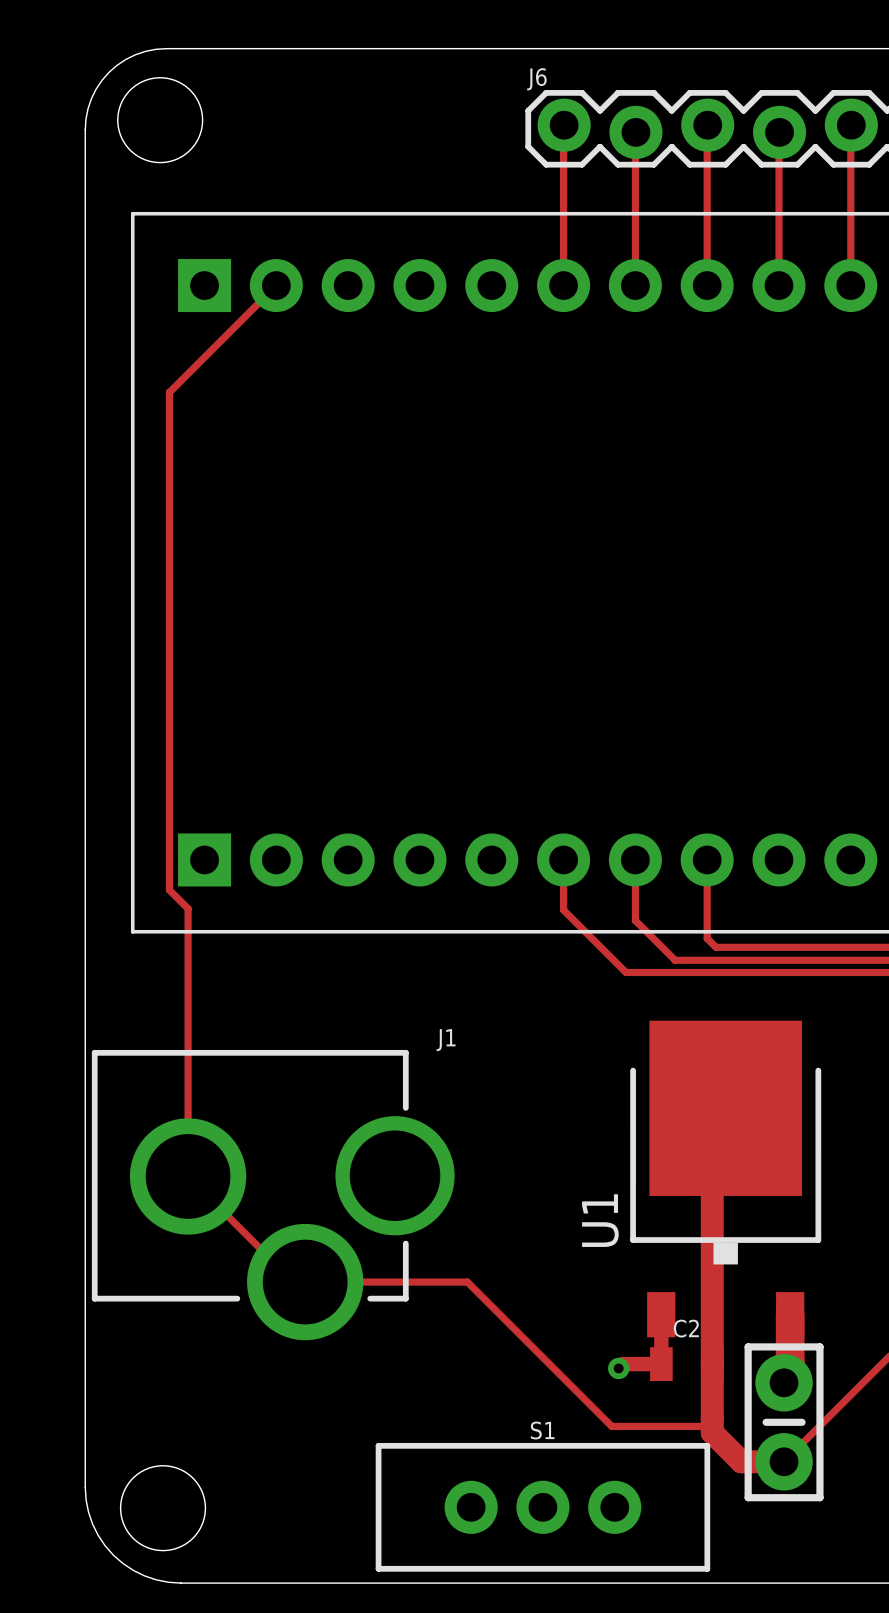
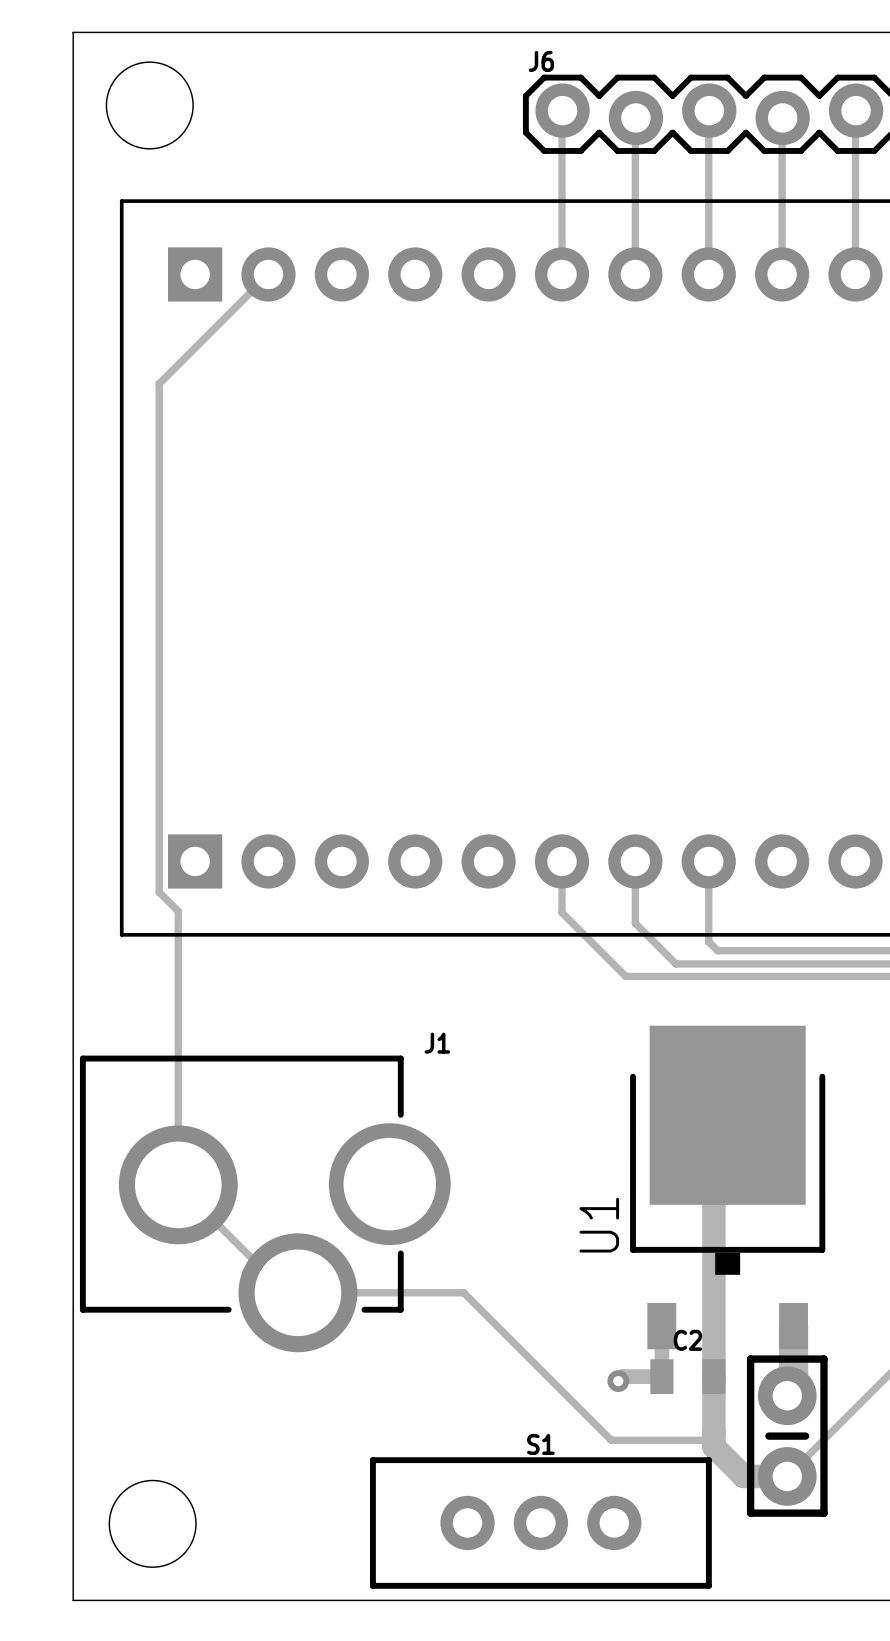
board edge: (166, 48) (135, 54) (109, 72) (91, 98) (85, 129) -> (156, 32) (73, 32) (73, 115)
board edge: (85, 1487) (86, 1499) (92, 1524) (105, 1545) (113, 1555) (122, 1563) (144, 1575) (168, 1582) (180, 1583) -> (73, 1502) (73, 1600) (171, 1600)

